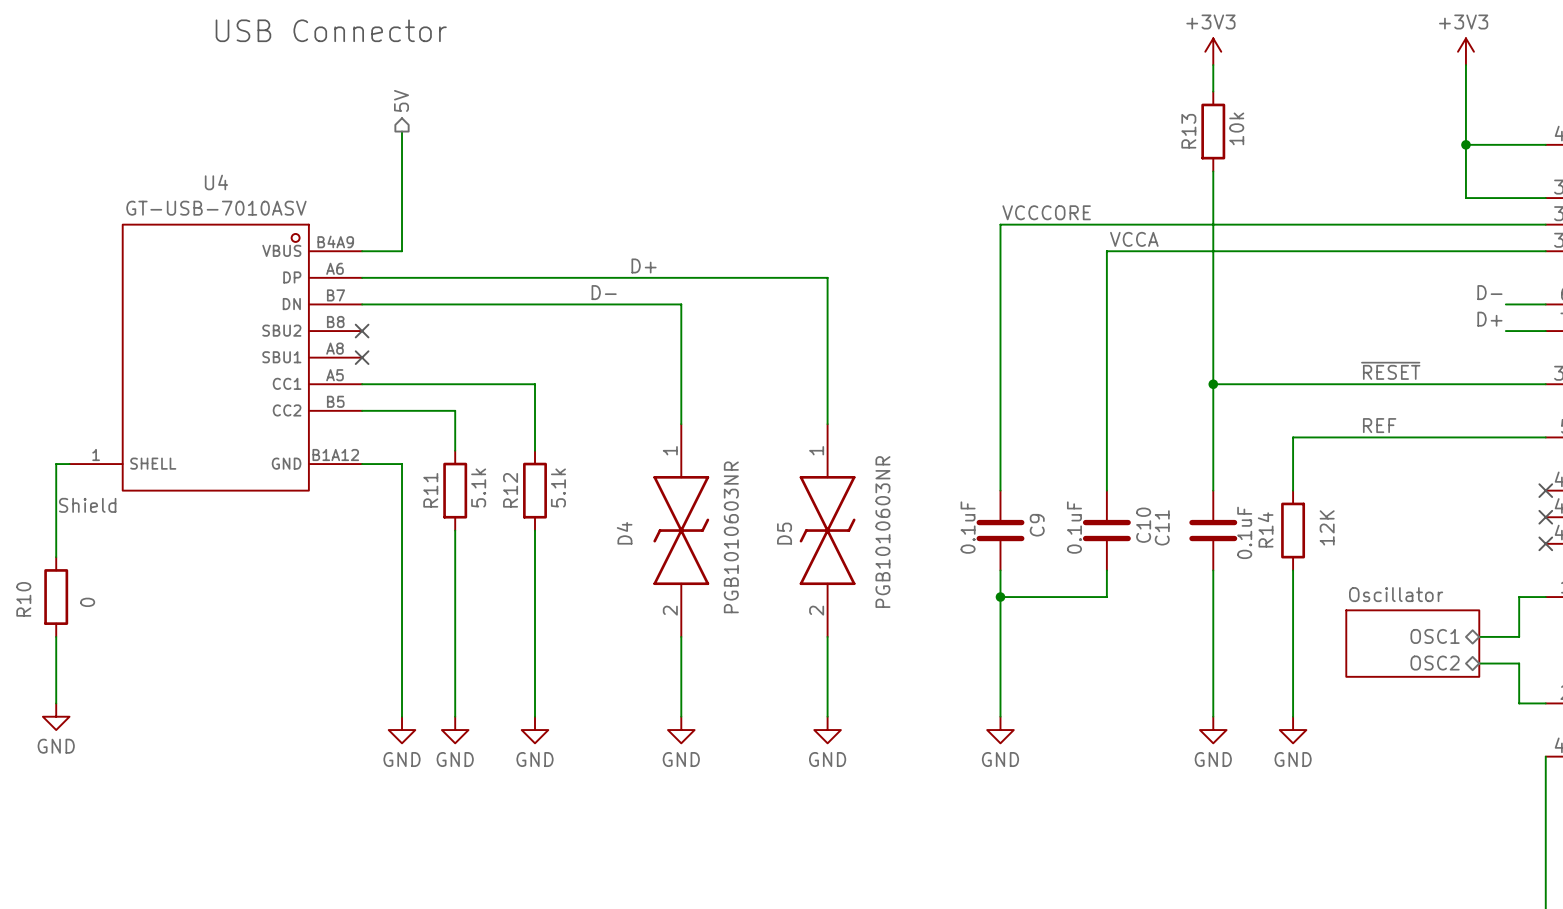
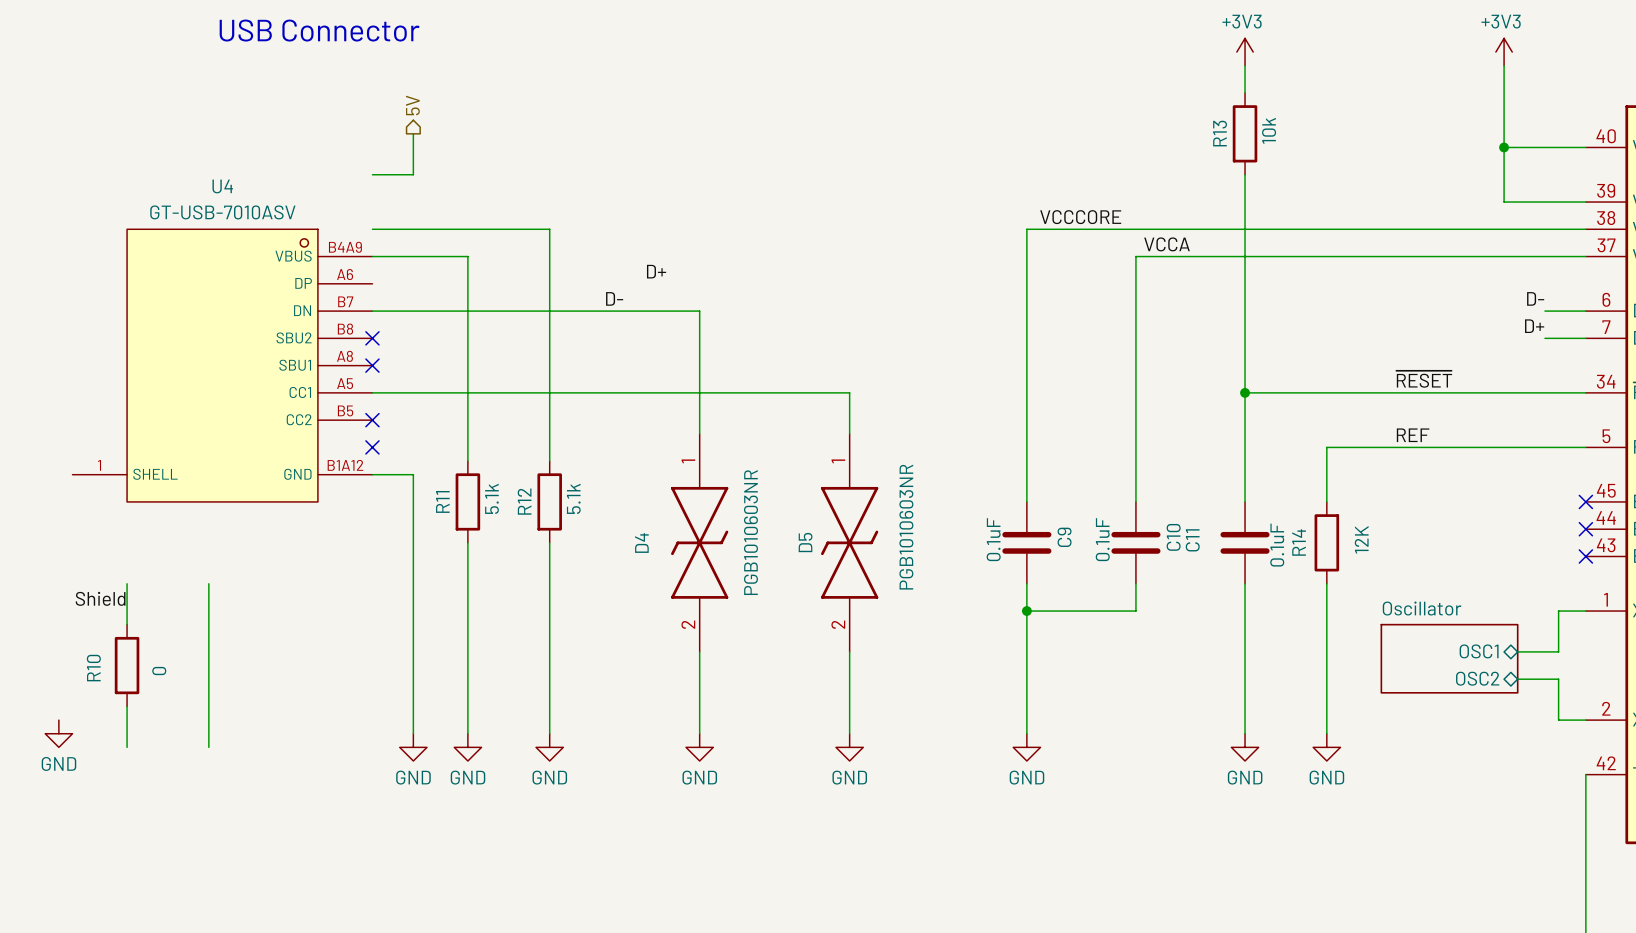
wire: (402, 171) (402, 251) -> (413, 174) (372, 174)
wire: (362, 277) (827, 277) (827, 384) -> (372, 229) (549, 229) (549, 392) (849, 392)
wire: (362, 410) (455, 410) -> (413, 256) (467, 256) (467, 420)
no-connect mark: none -> (372, 420)
no-connect mark: none -> (372, 447)
wire: (69, 464) (56, 464) (56, 557) -> none
label position: Shield (87, 505) -> Shield (100, 598)
wire: none -> (127, 583) (127, 624)
wire: none -> (208, 583) (208, 747)
R10 position: (56, 597) -> (127, 665)
wire: (56, 636) (56, 703) -> none
wire: none -> (127, 706) (127, 747)

